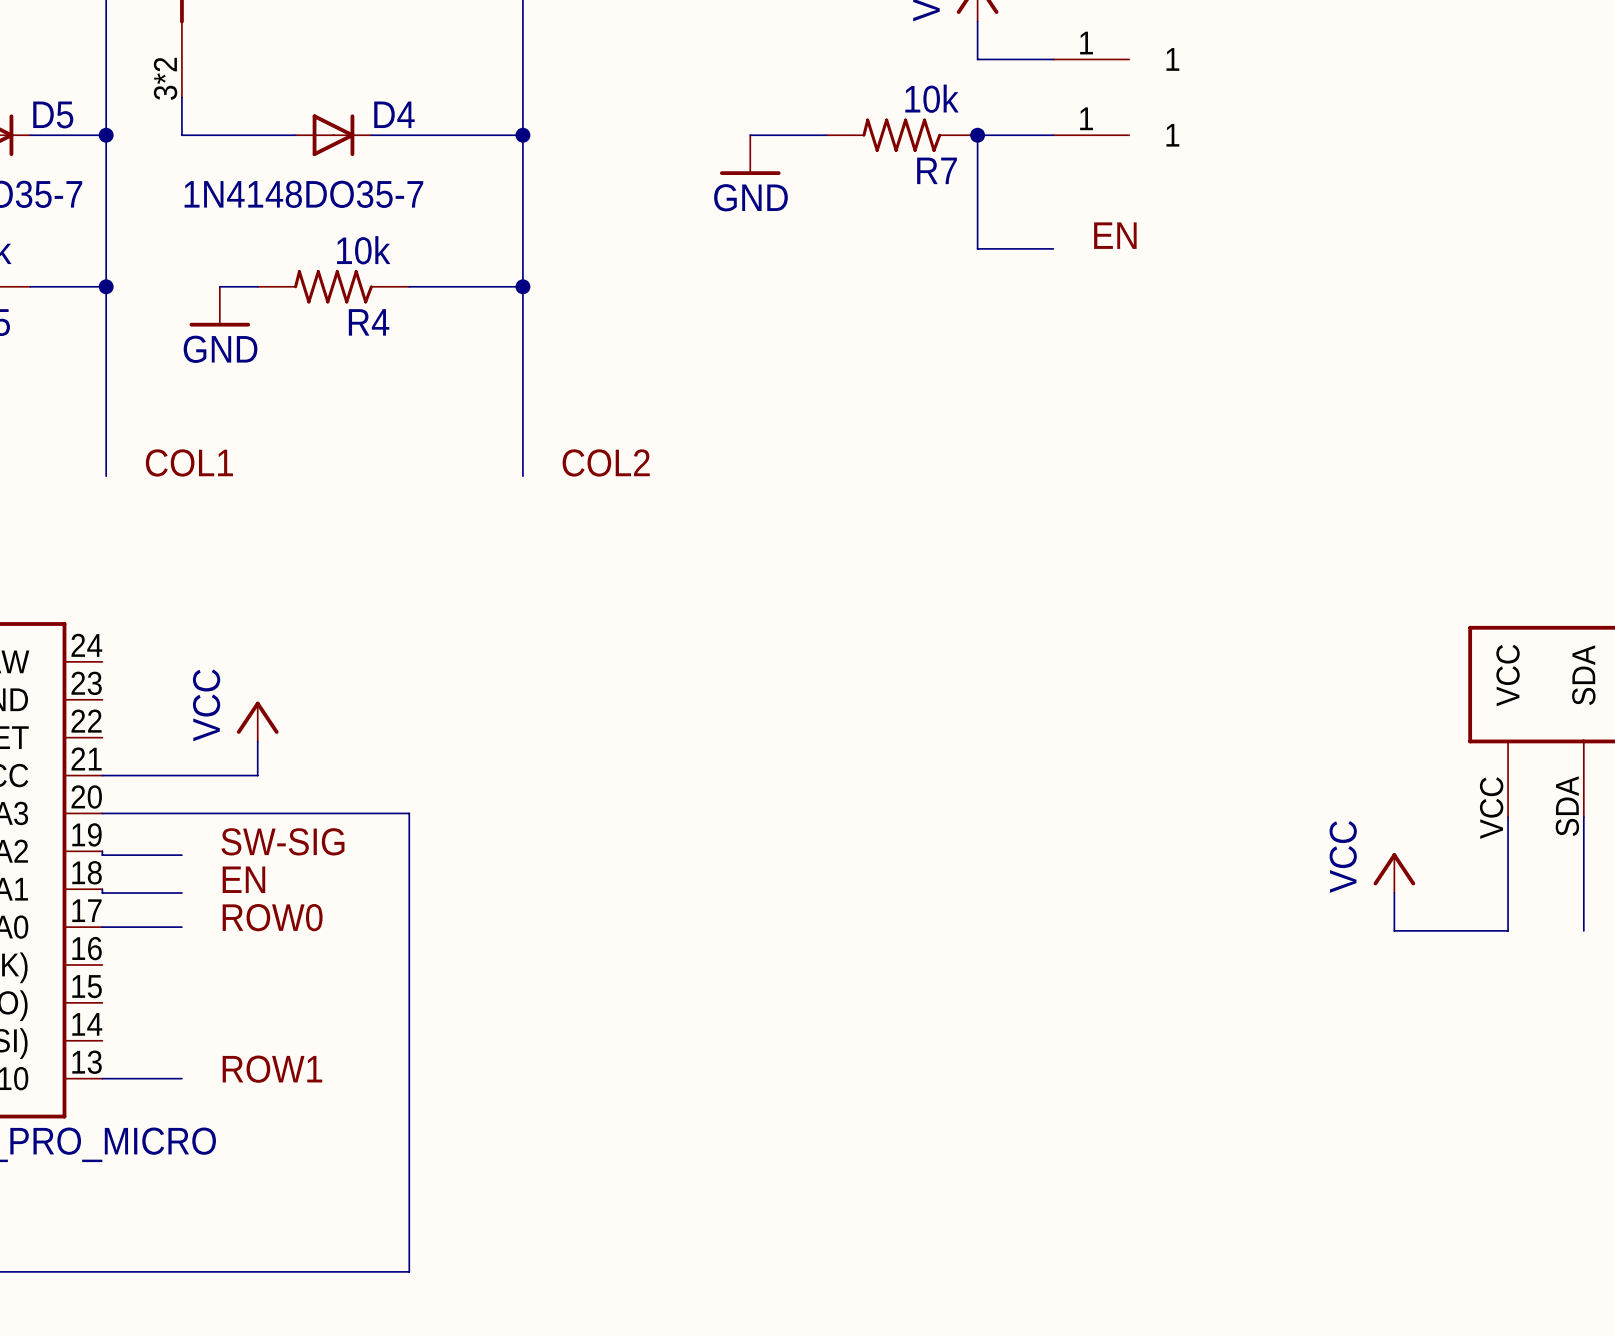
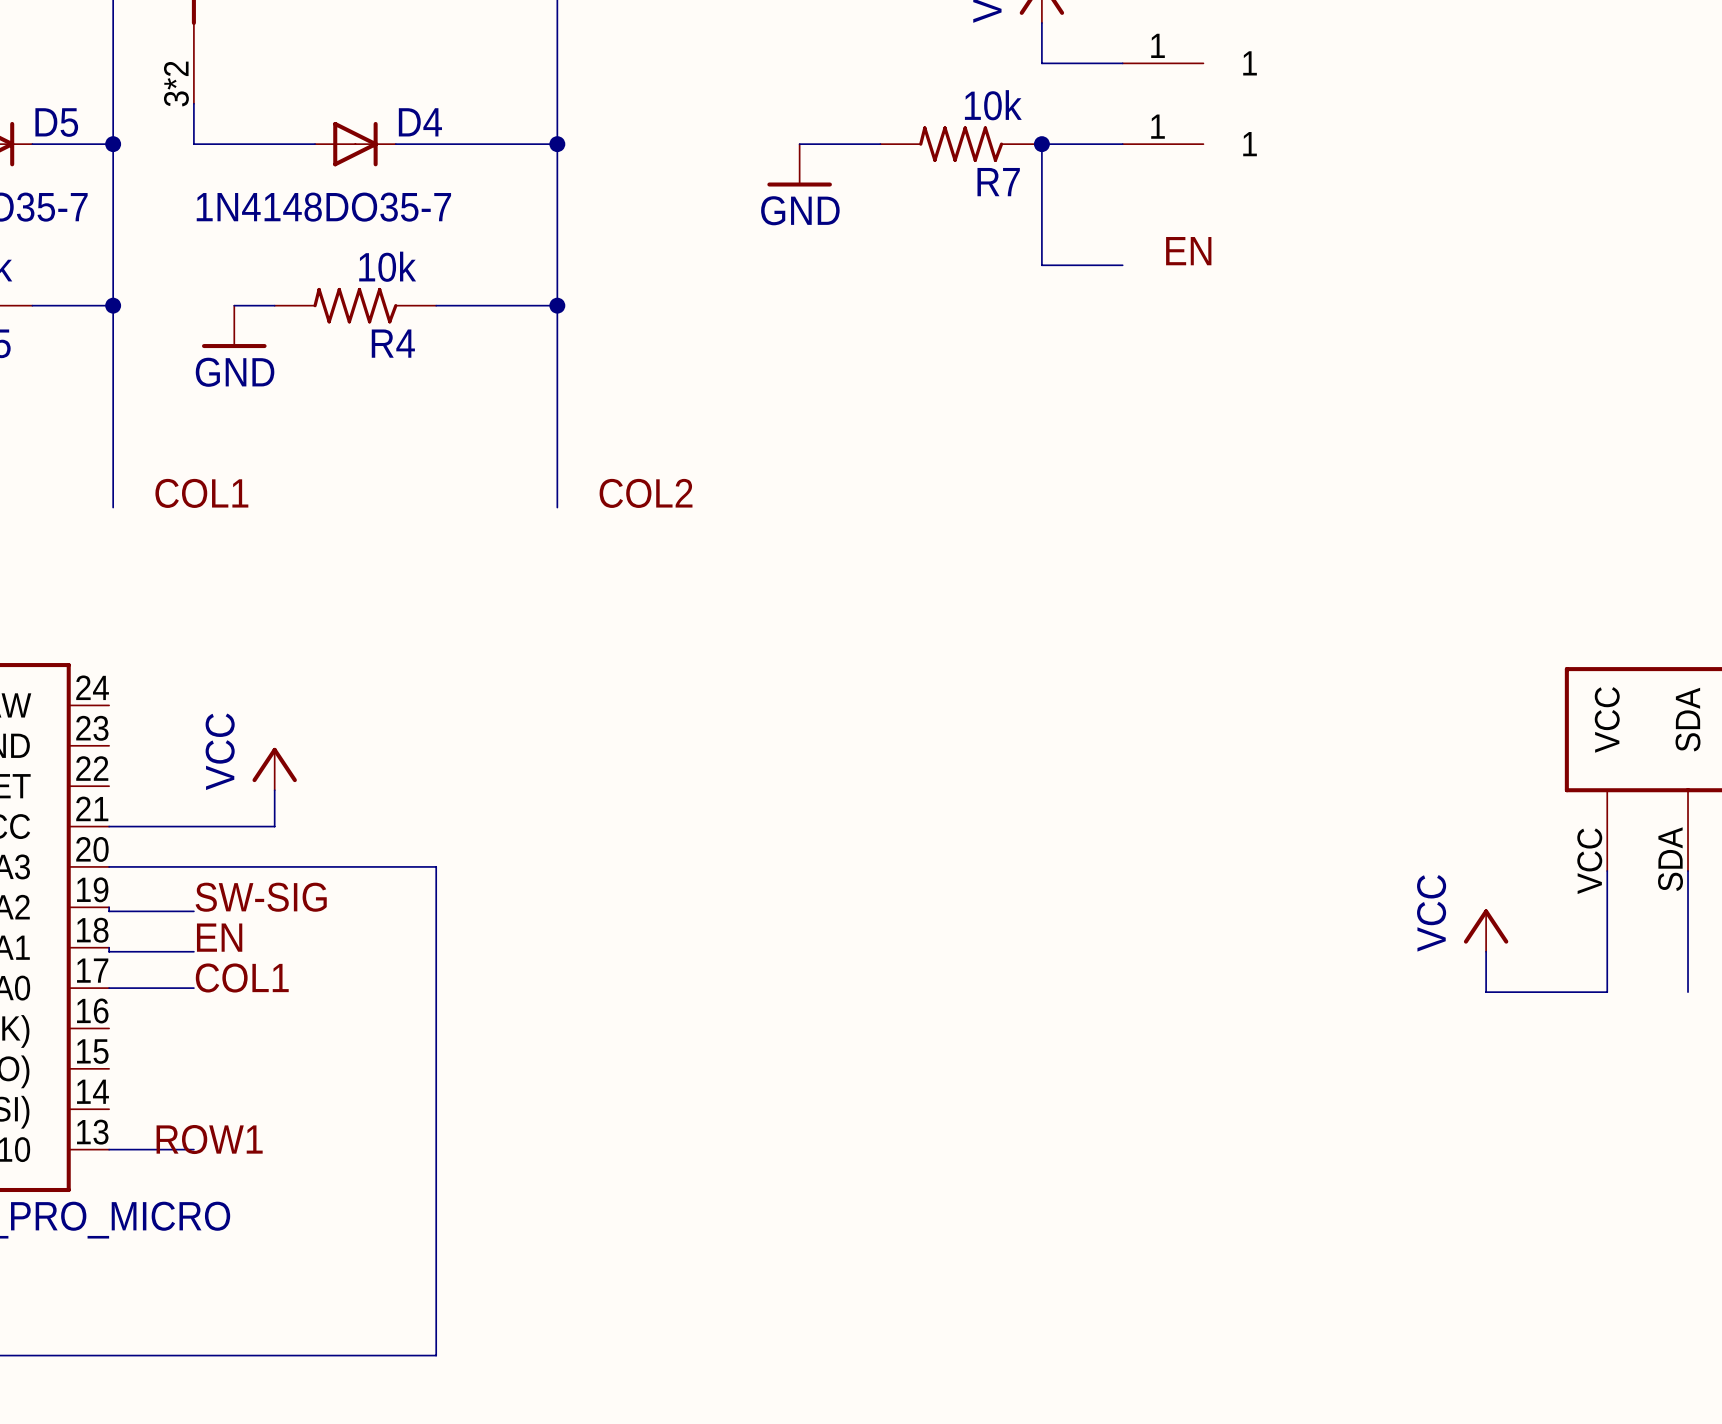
label position: SW-SIG (282, 841) -> SW-SIG (261, 897)
label position: EN (243, 879) -> EN (219, 937)
label: none -> COL1 (242, 977)
label: ROW0 (272, 917) -> none
label position: ROW1 (272, 1069) -> ROW1 (209, 1139)

